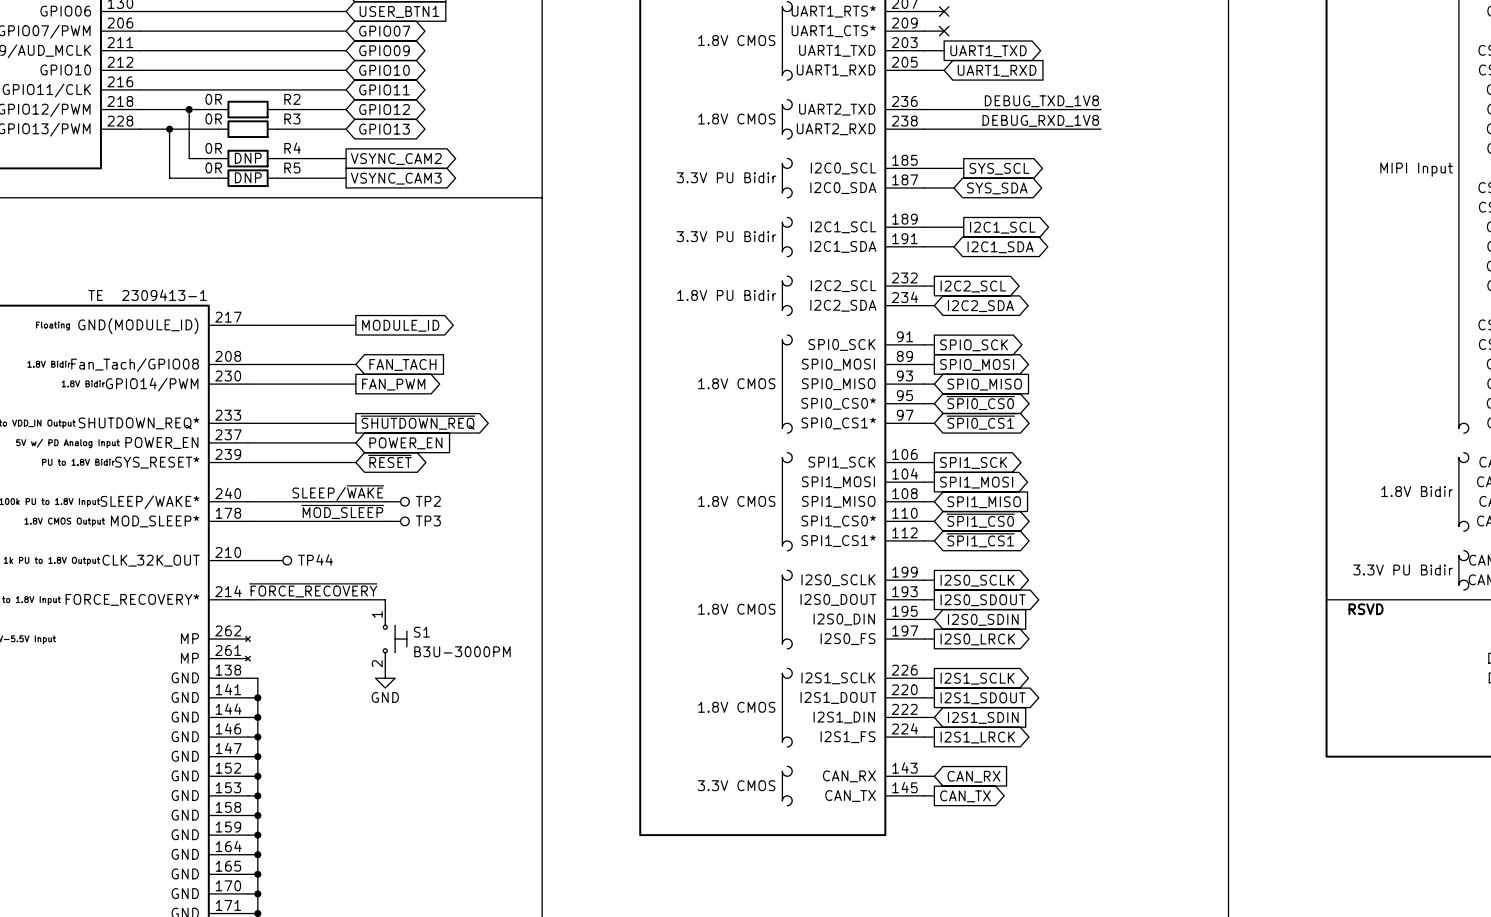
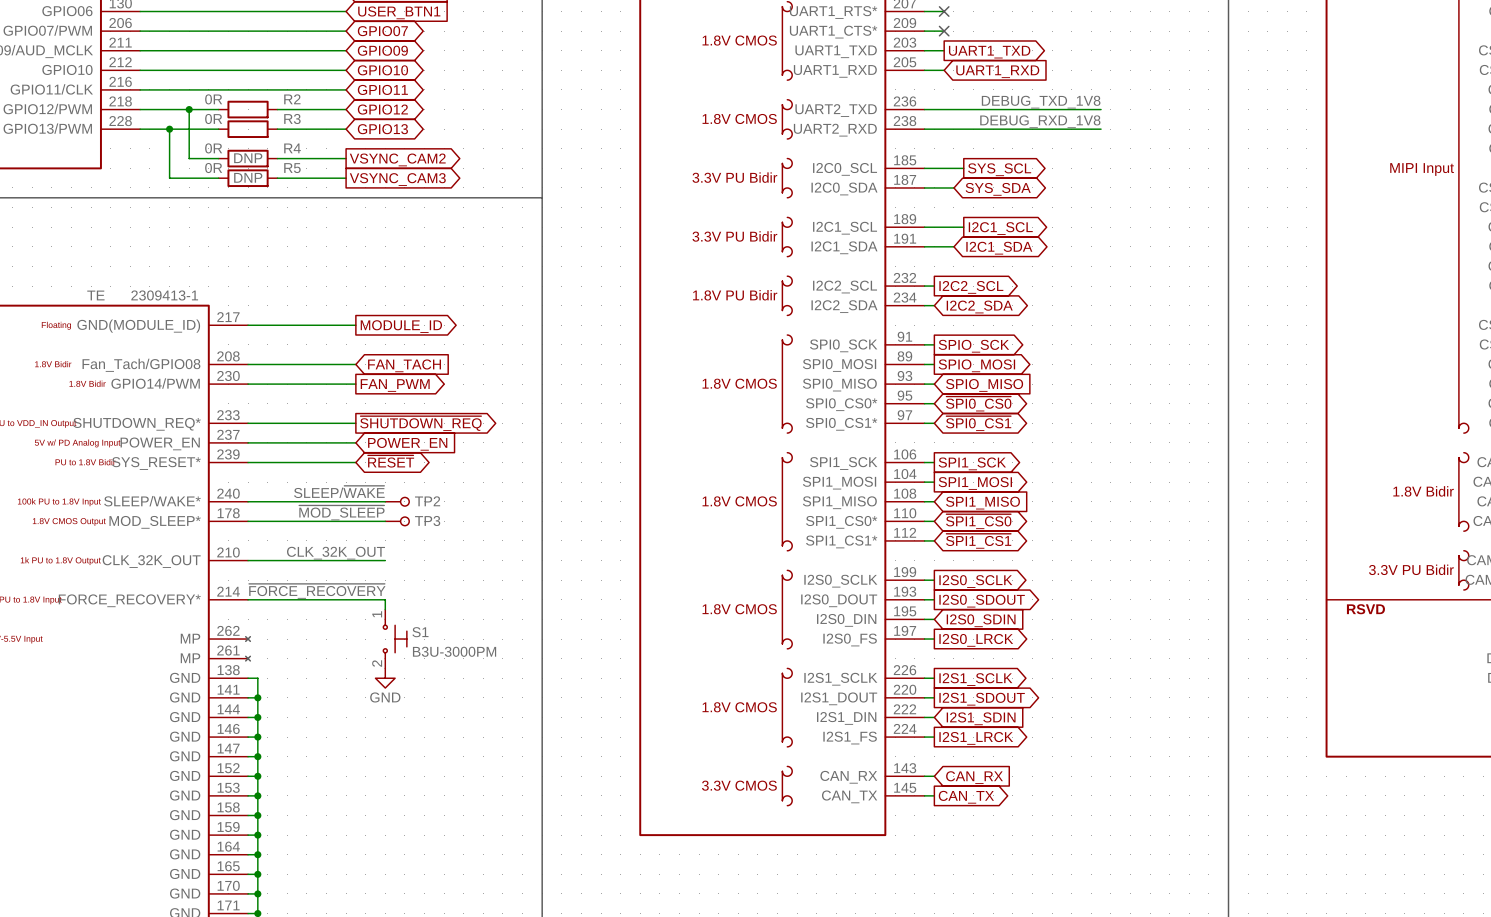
label: none -> CLK_32K_OUT (335, 553)
wire: none -> (267, 560) (385, 560)
TP44: (279, 560) -> none

